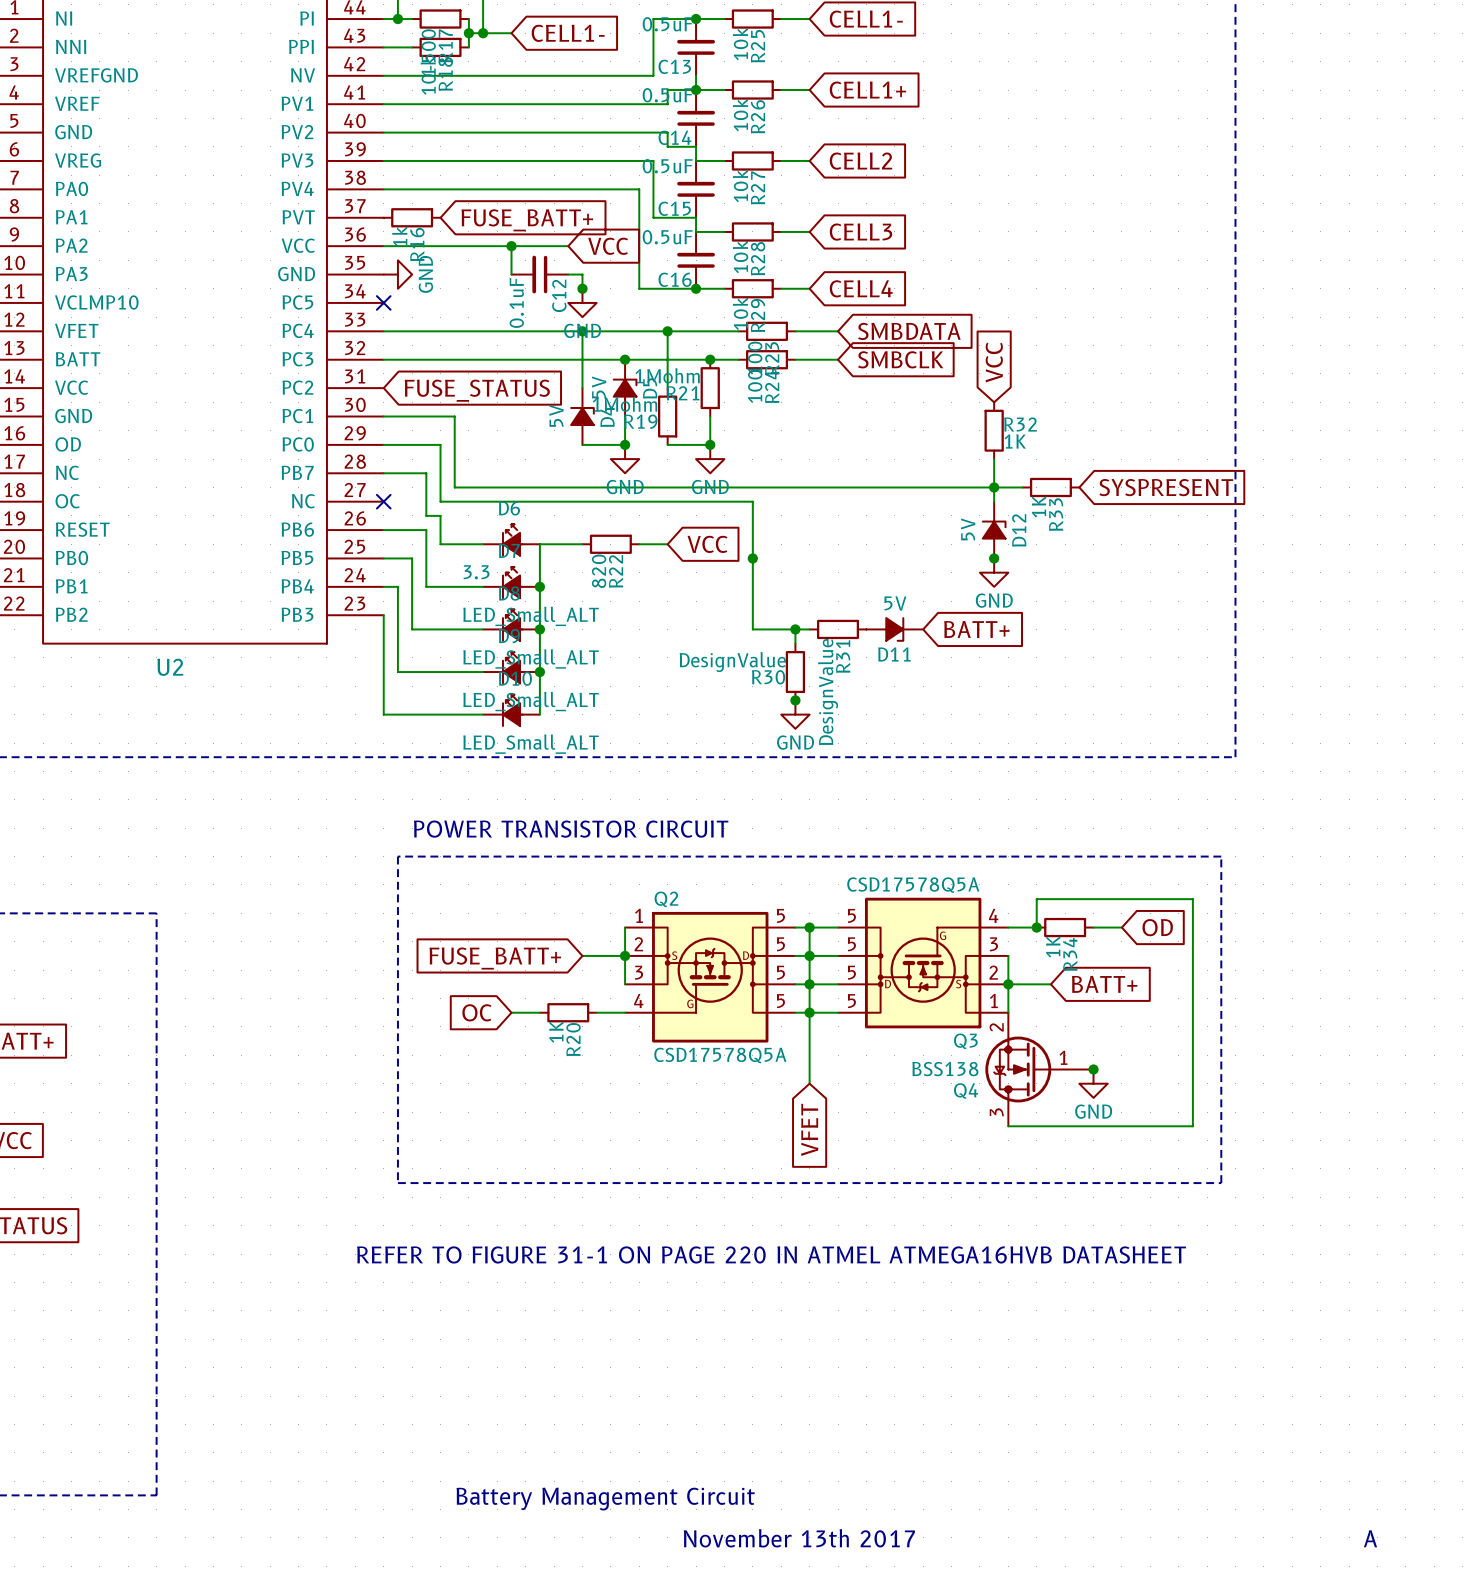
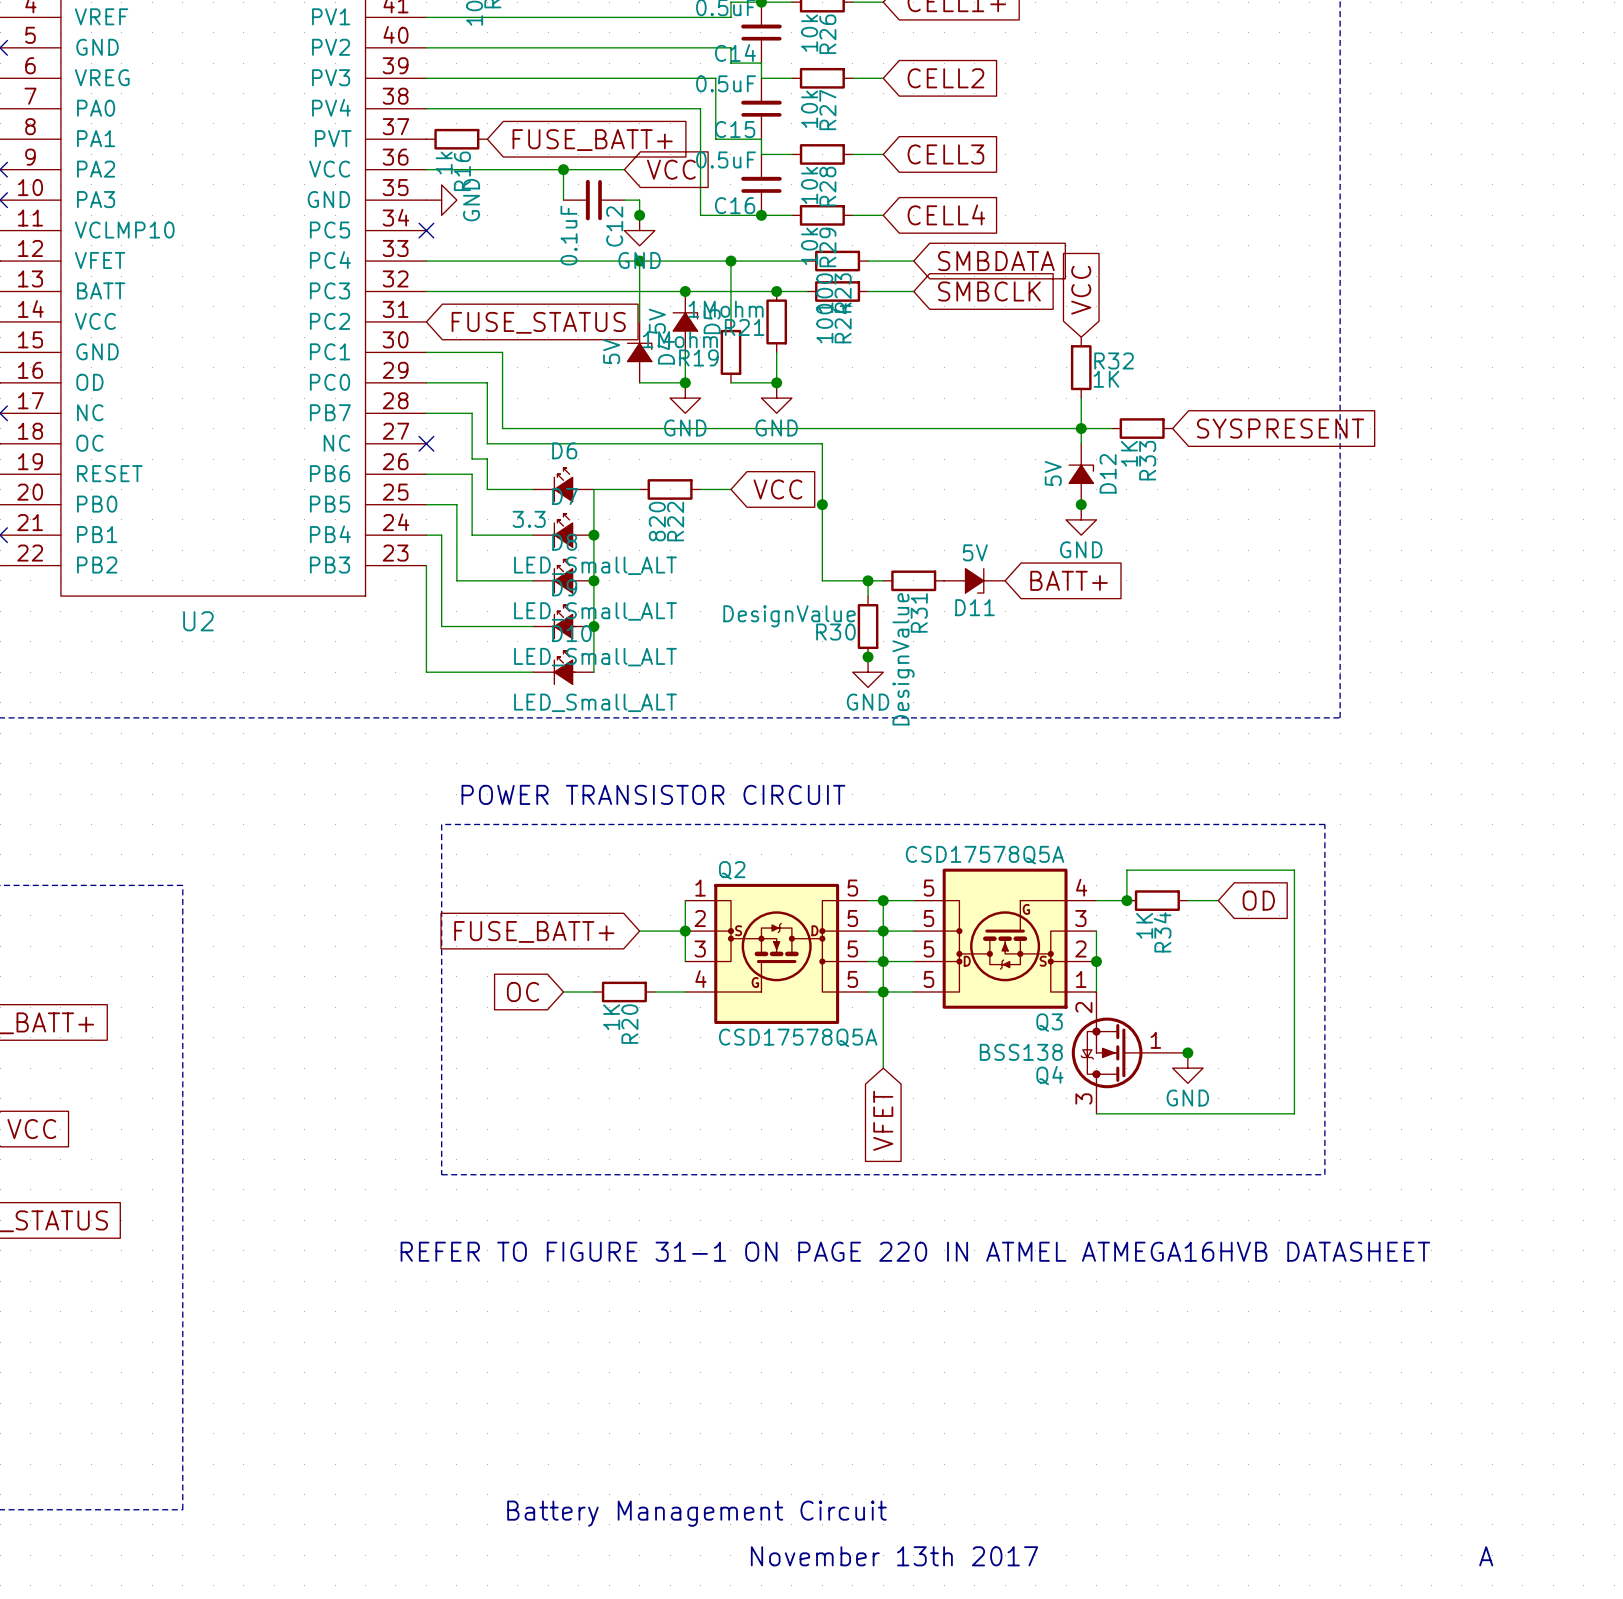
wire: (1008, 984) (1050, 984) -> none
global label: BATT+ (1104, 984) -> none

